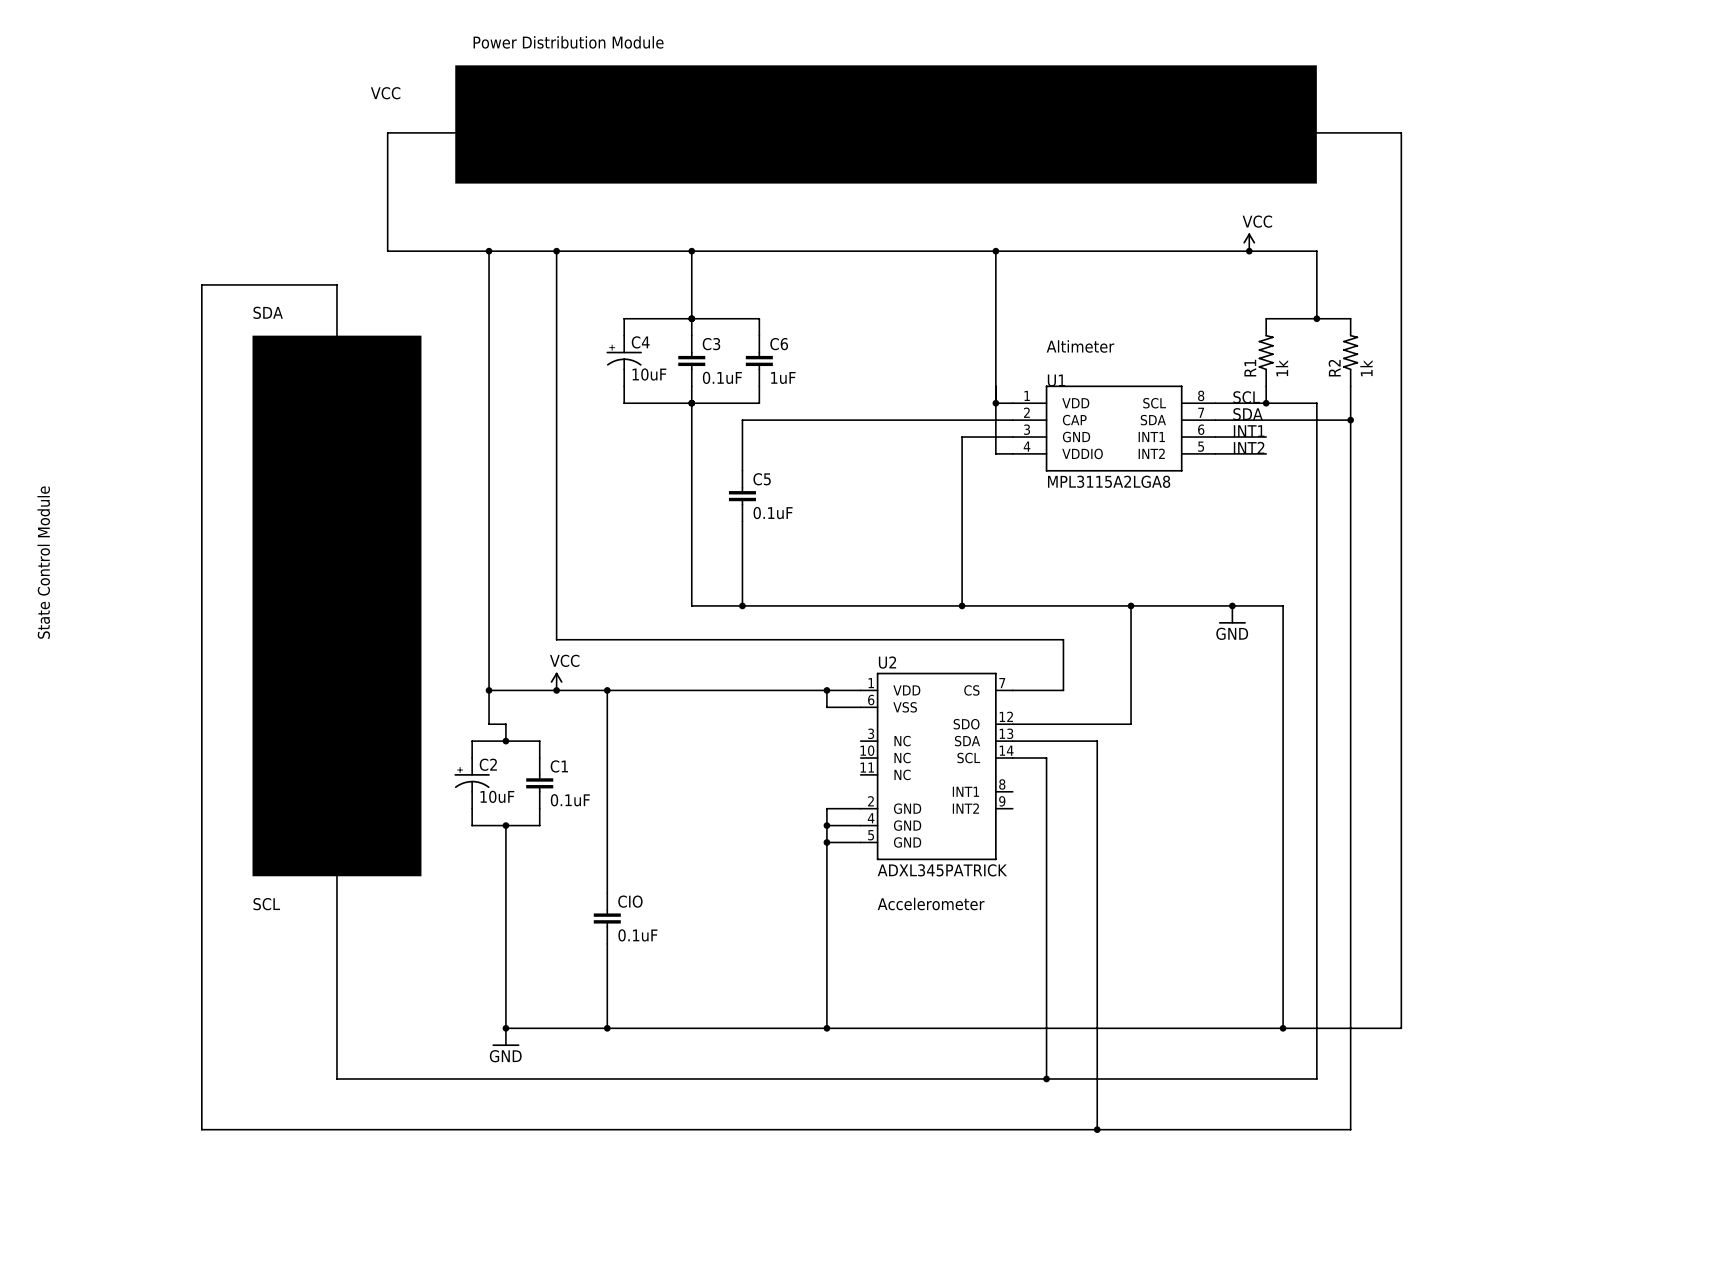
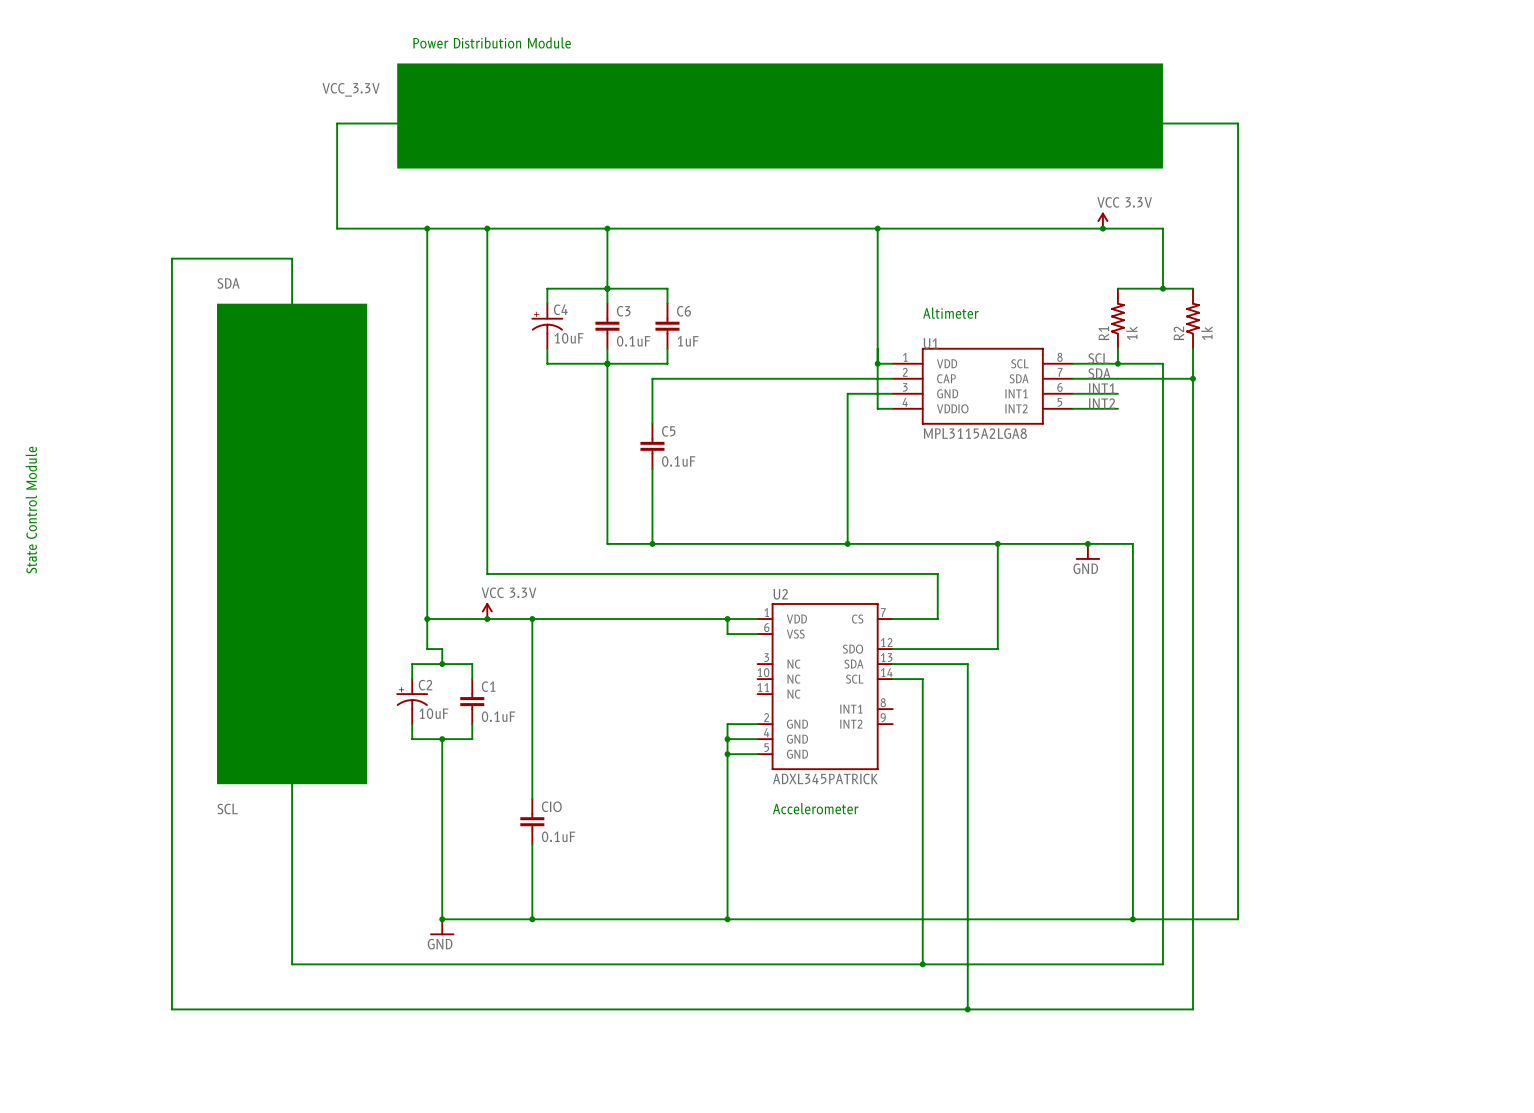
label: VCC (385, 93) -> VCC_3.3V (351, 89)
power symbol: VCC (1249, 242) -> VCC 3.3V (1102, 220)
power symbol: VCC (556, 681) -> VCC 3.3V (487, 611)

